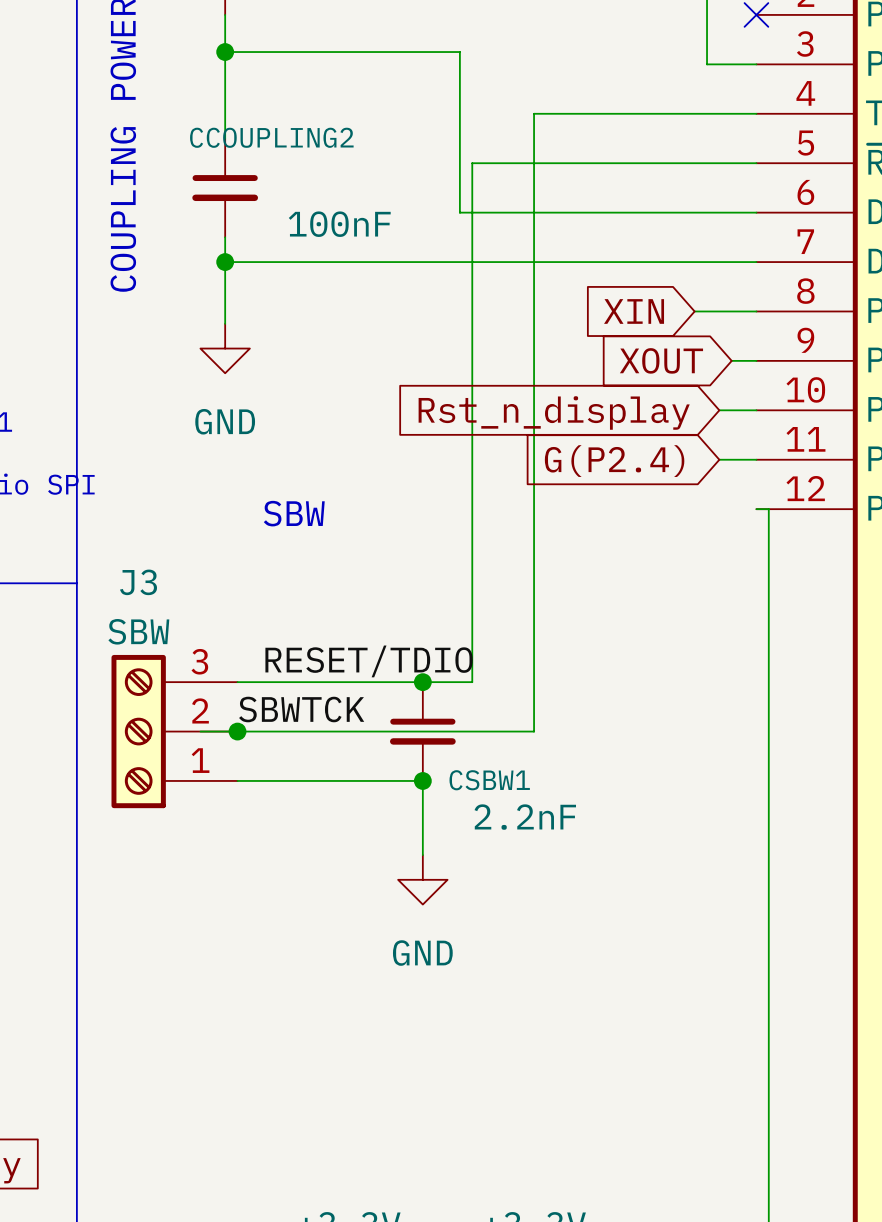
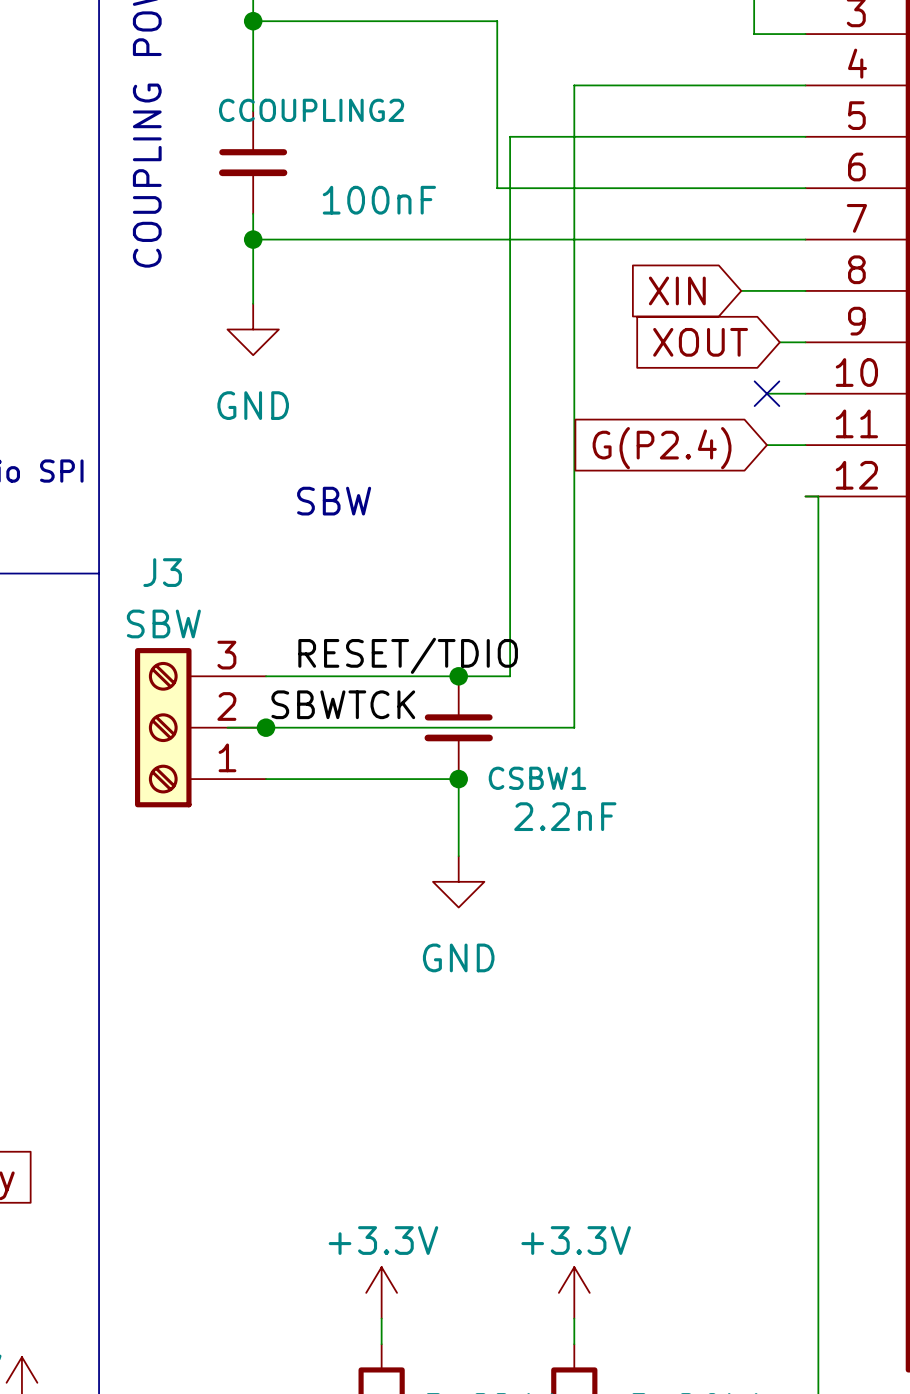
no-connect mark: none -> (766, 393)
global label: Rst_n_display (554, 412) -> none

